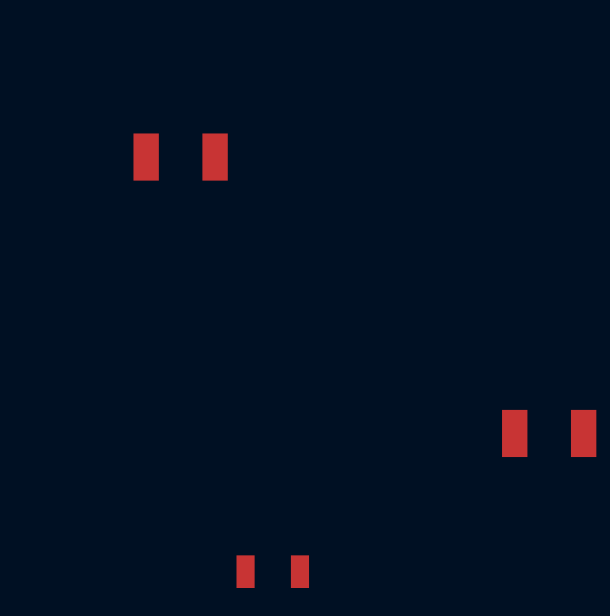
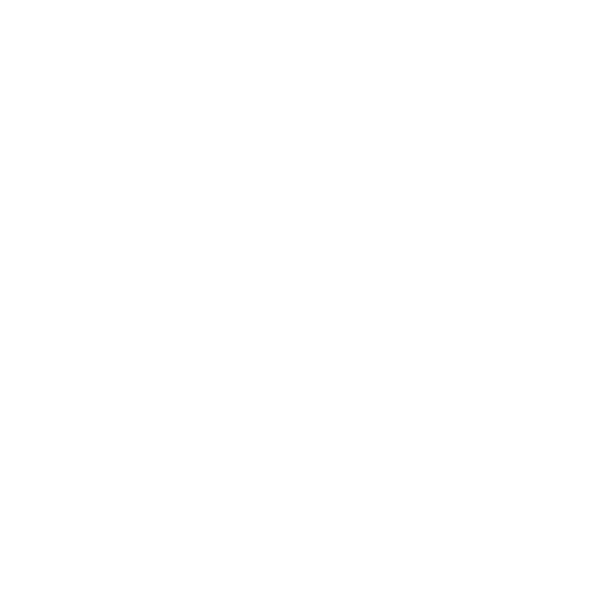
part: (180, 157) -> none
part: (549, 433) -> none
part: (272, 571) -> none

